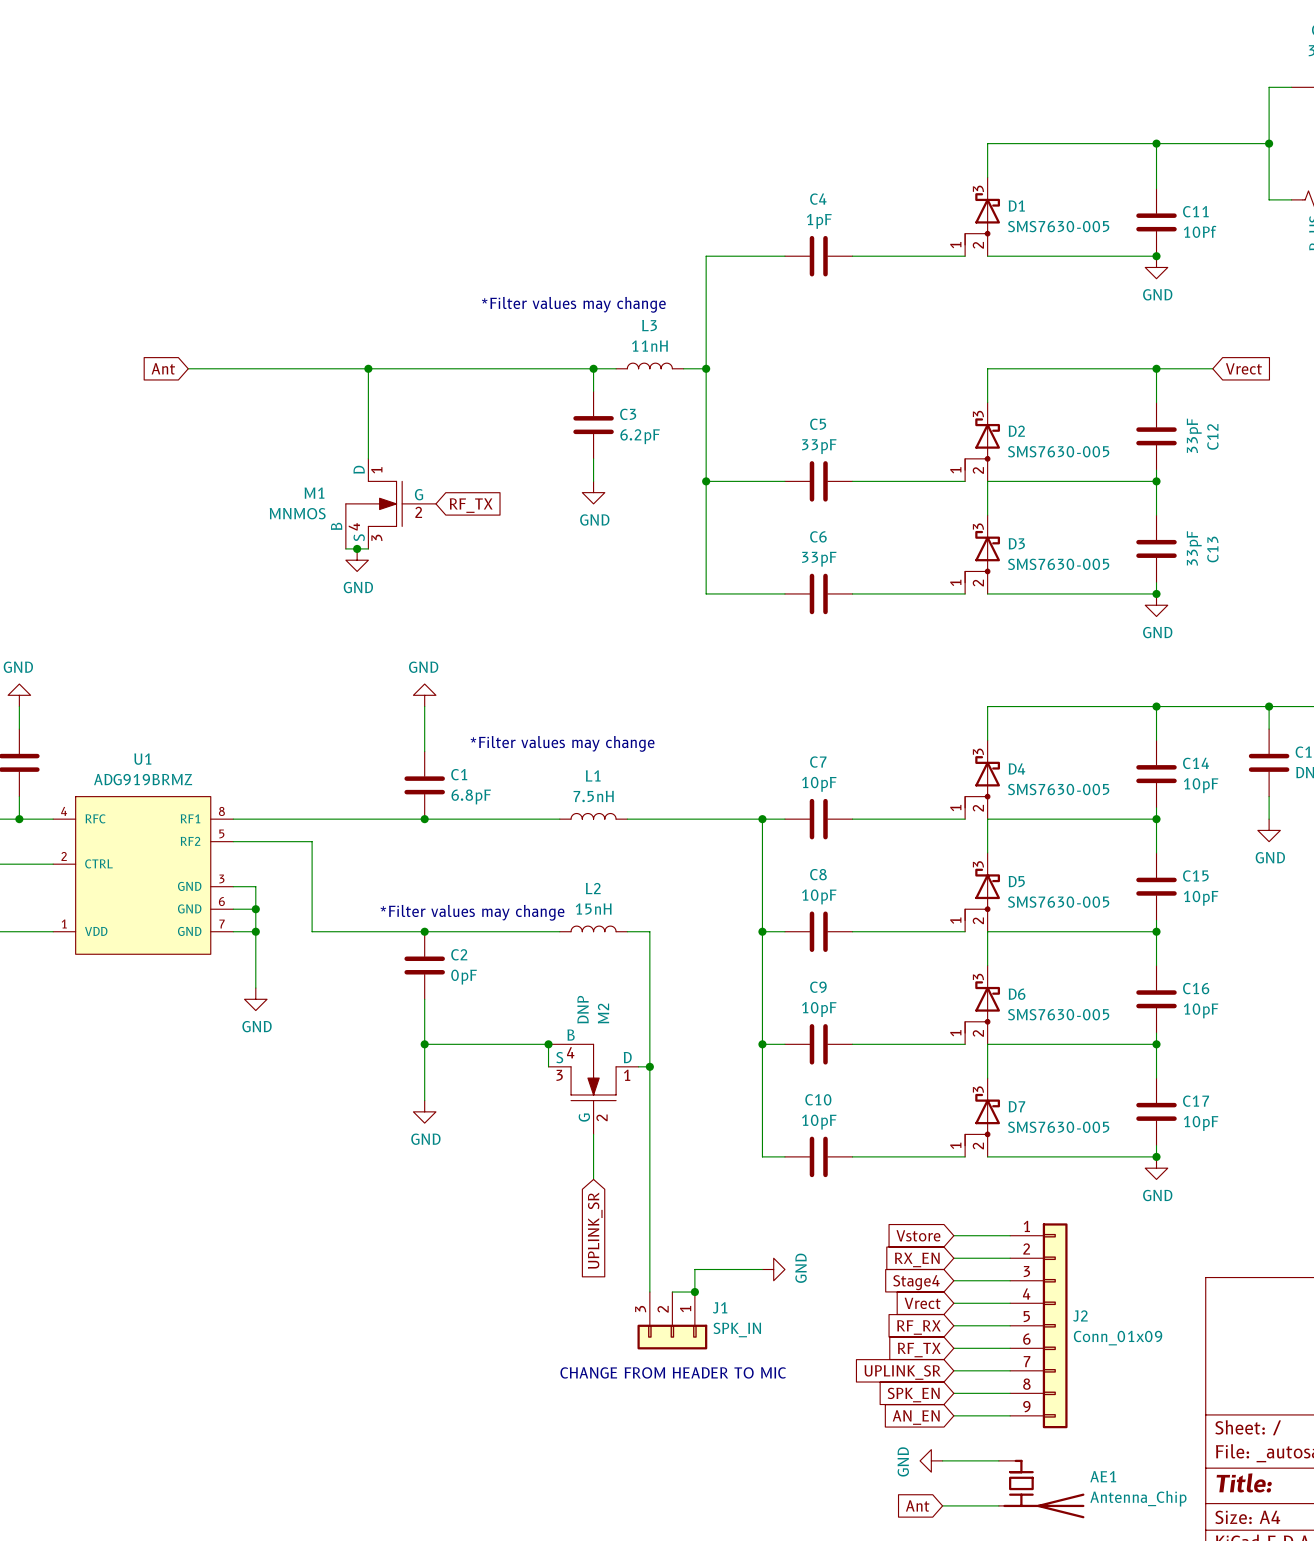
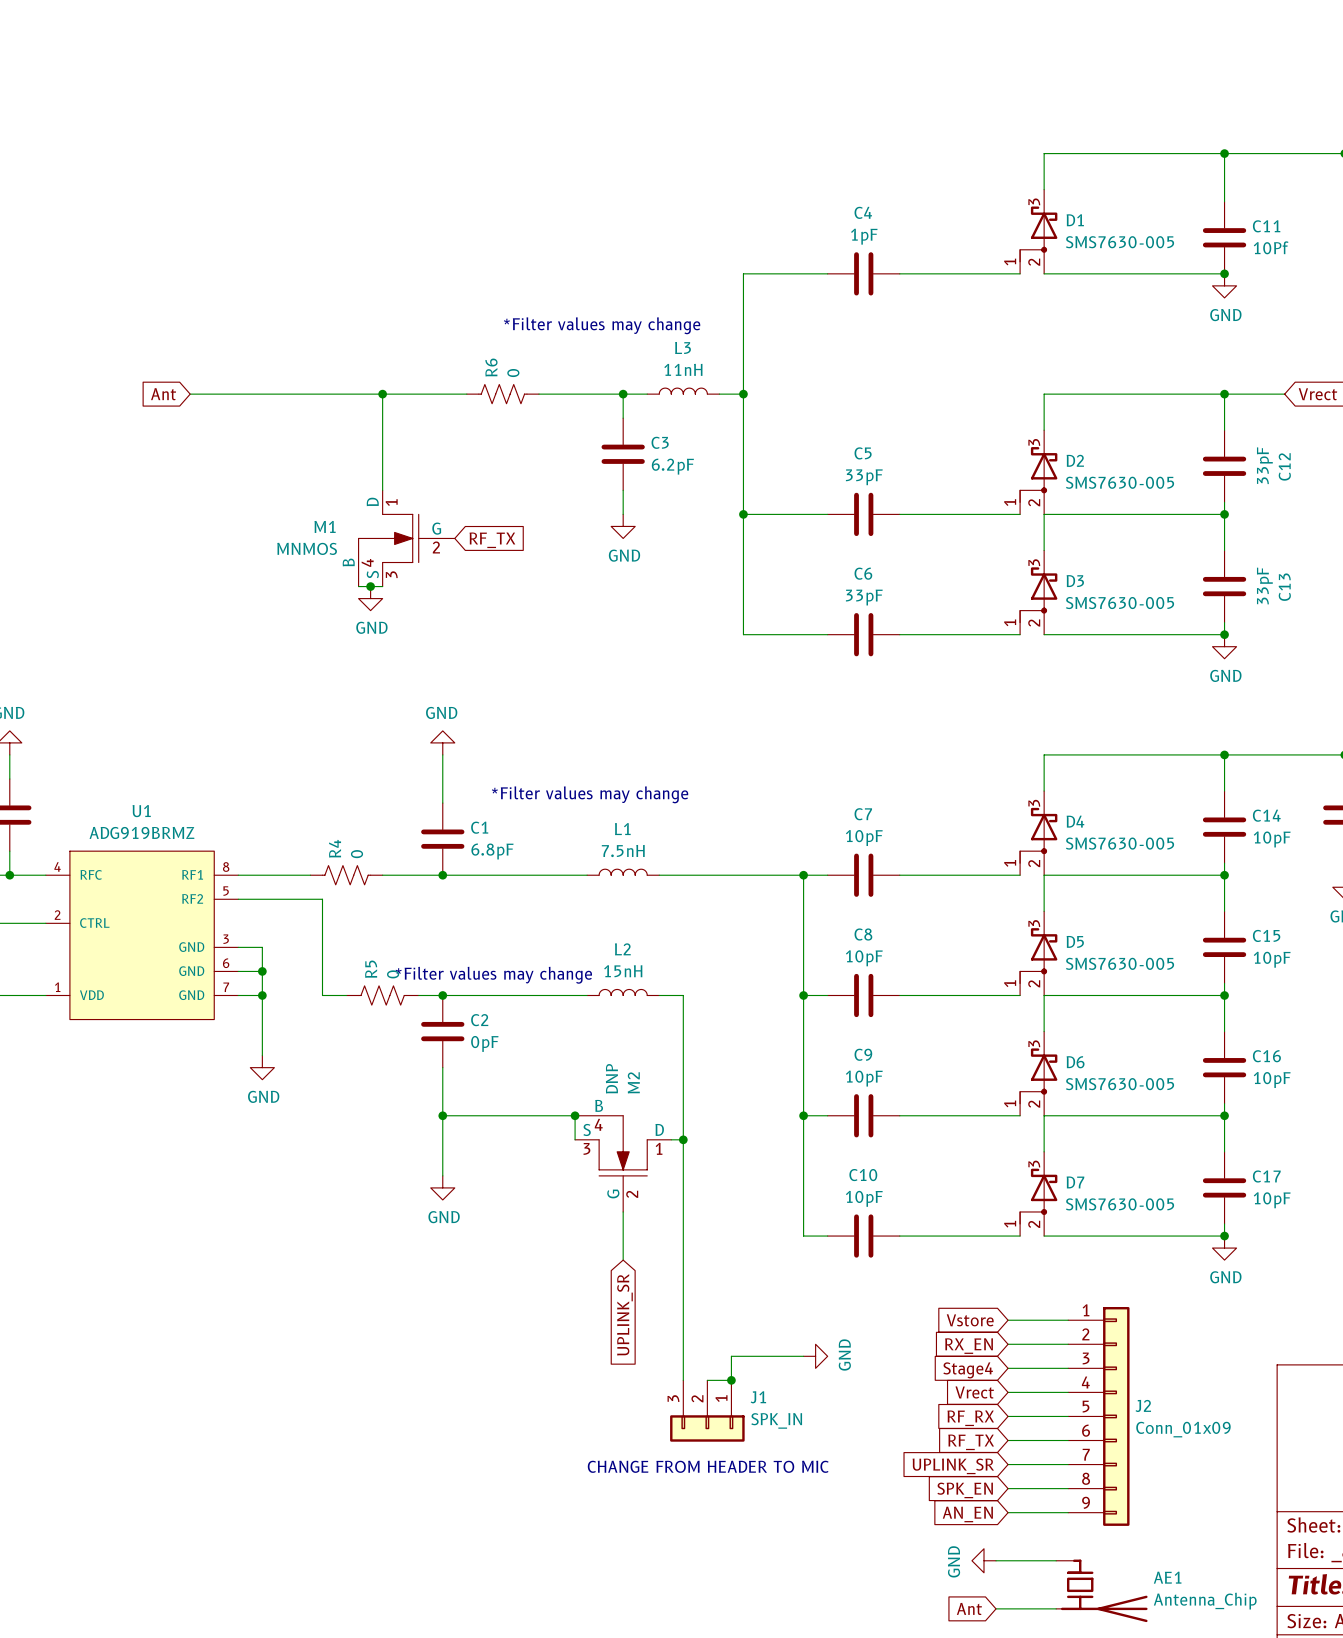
R6: none -> 0 (502, 394)
R4: none -> 0 (346, 875)
R5: none -> 0 (382, 995)

